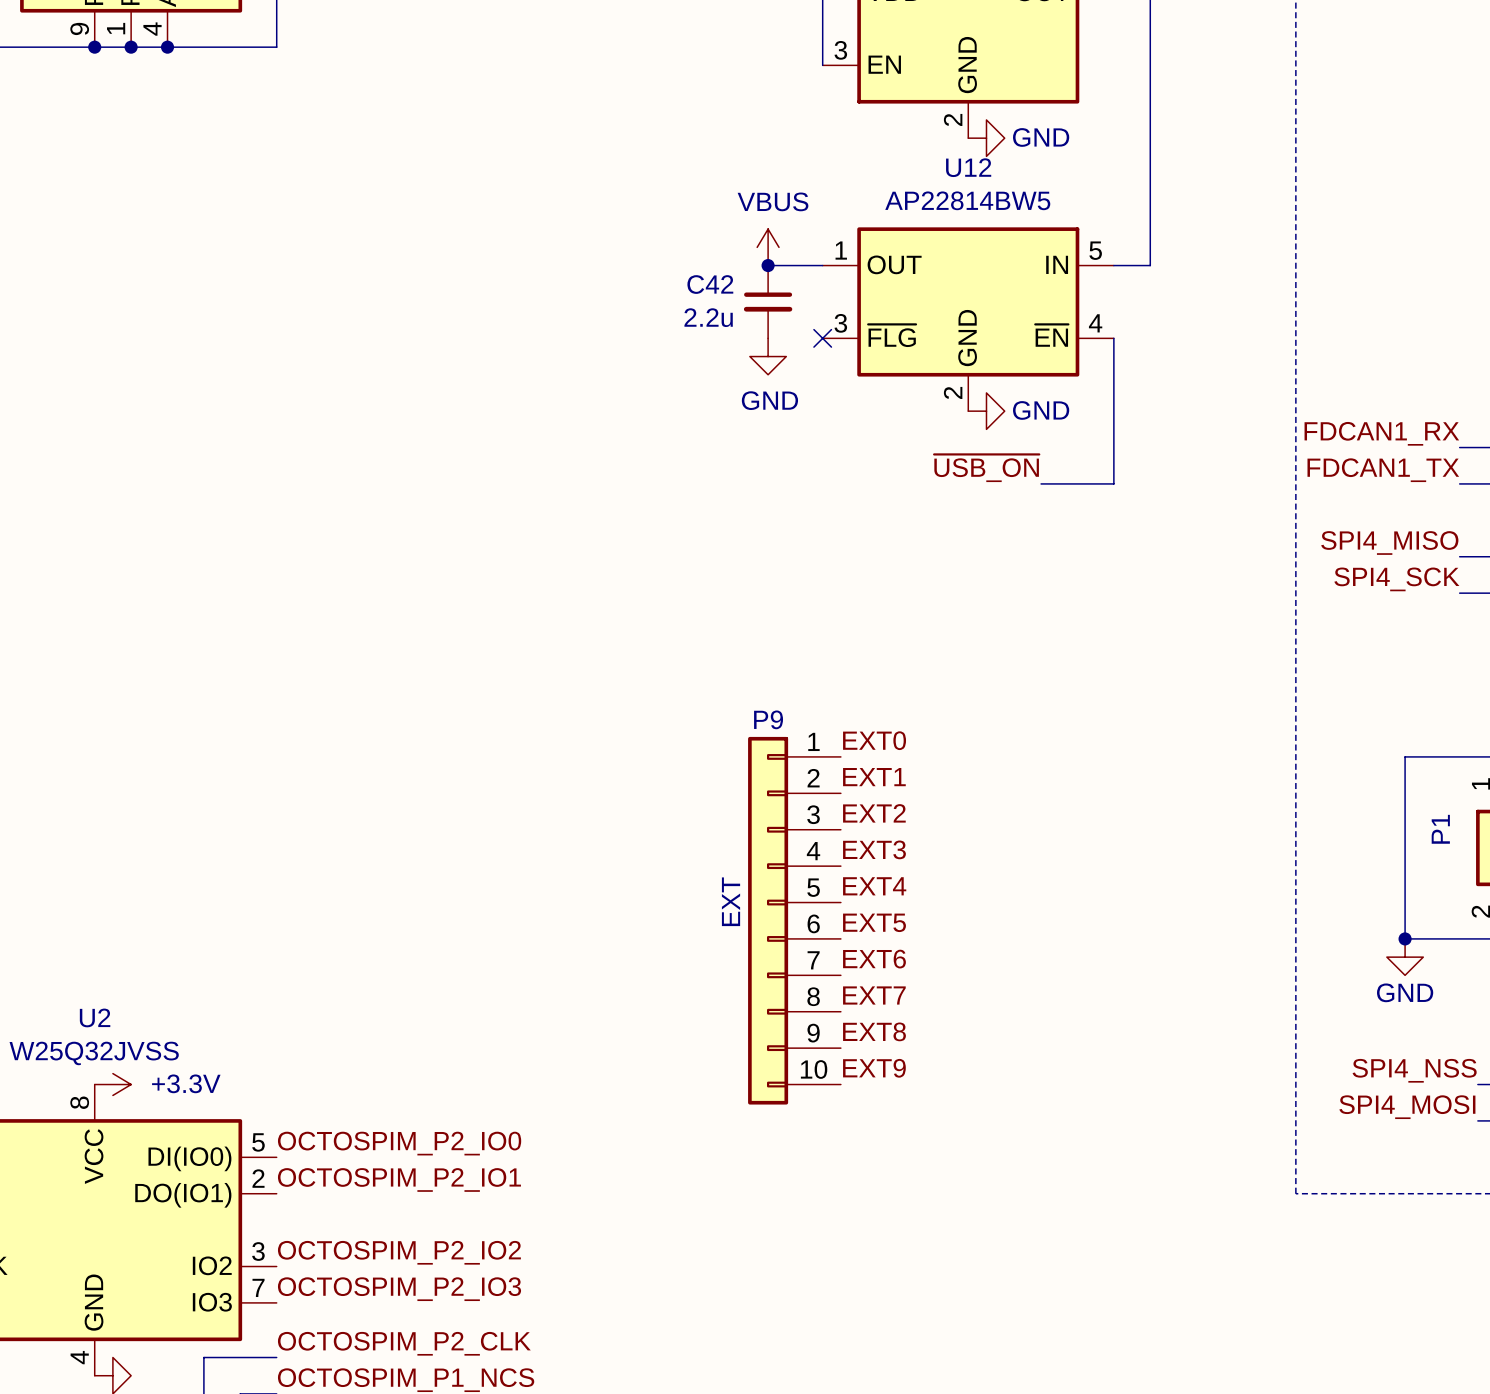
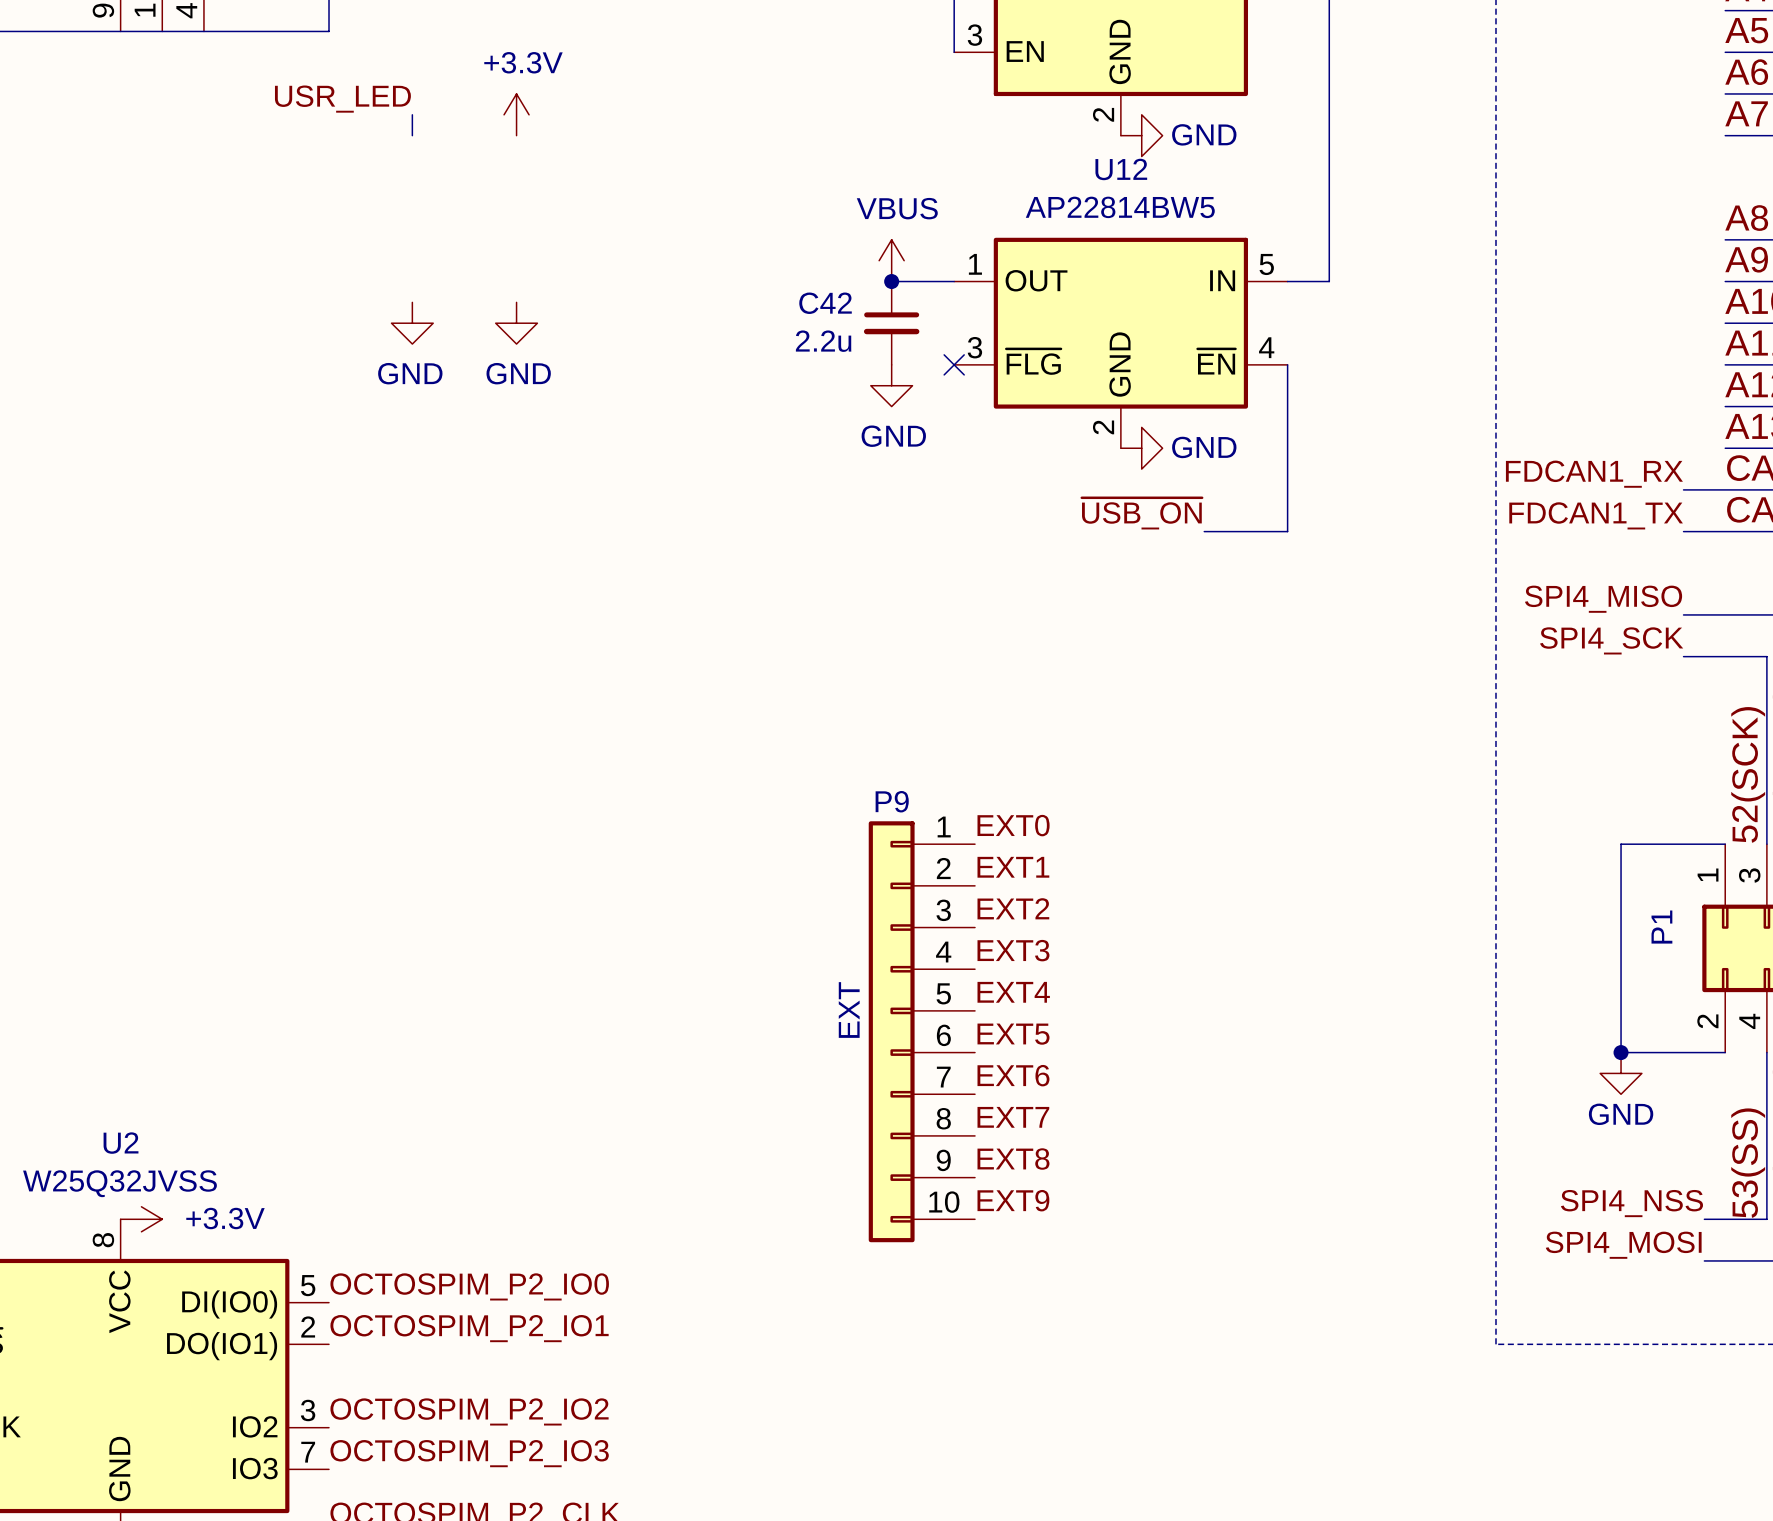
junction: (94, 47) -> none
junction: (131, 47) -> none
junction: (167, 47) -> none
label: none -> USR_LED (342, 99)
wire: none -> (412, 114) (412, 135)
power symbol: none -> +3.3V (516, 114)
power symbol: none -> GND (412, 323)
power symbol: none -> GND (516, 323)

